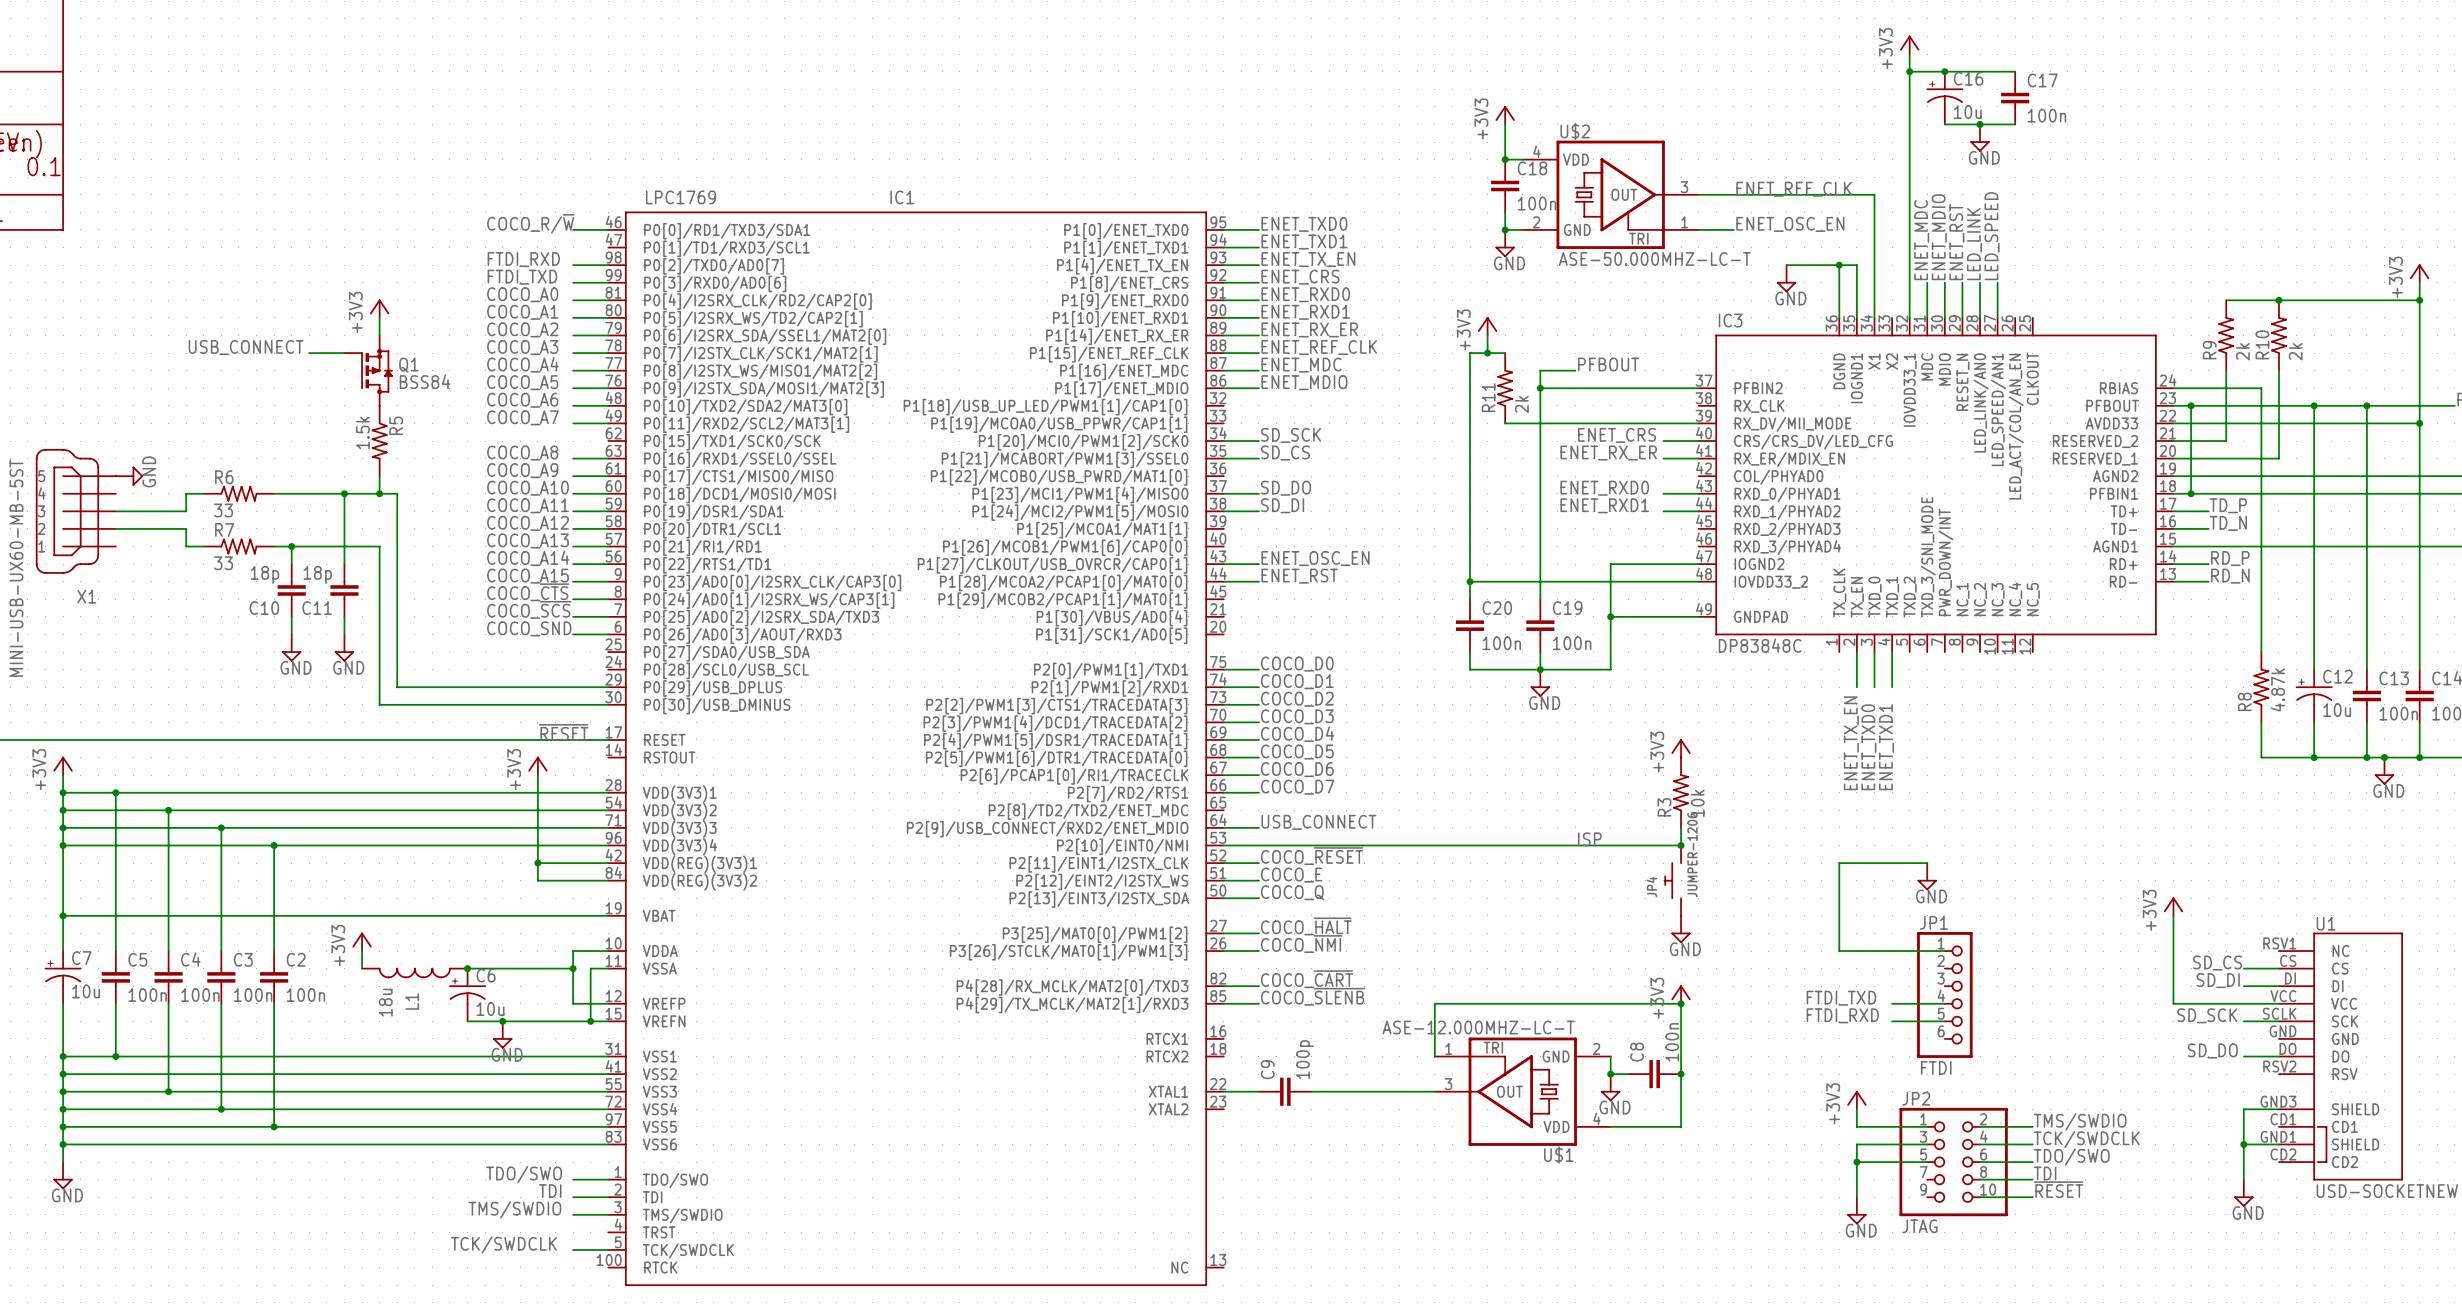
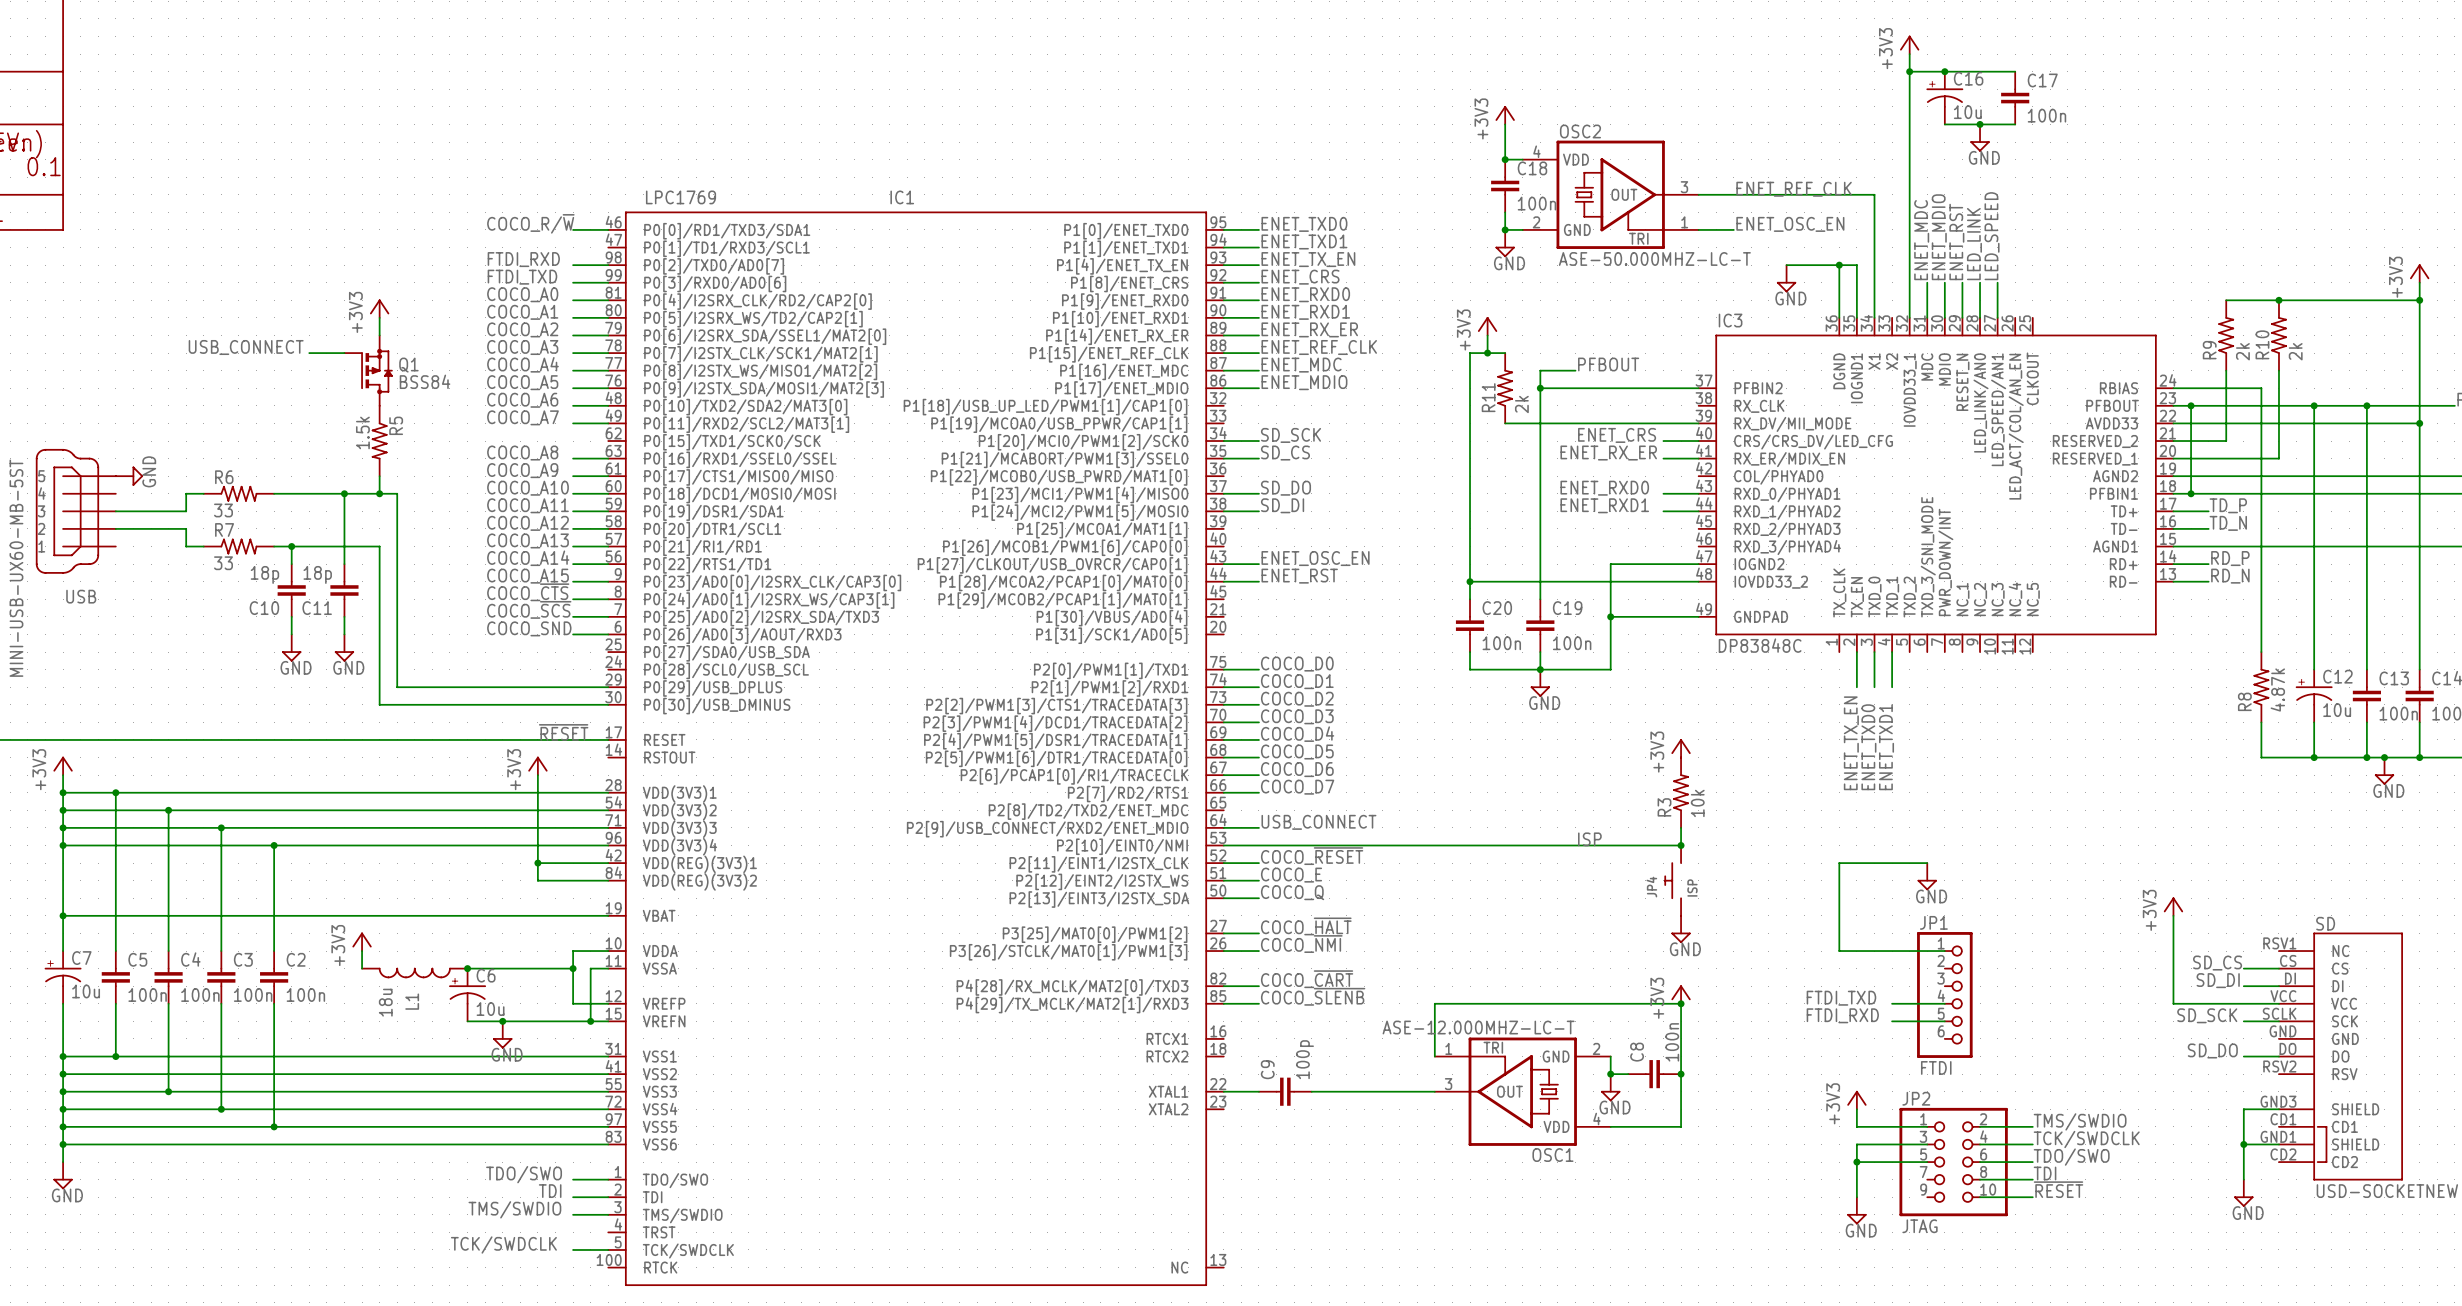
U$2 name: U$2 (1575, 131) -> OSC2 (1580, 131)
X1 name: X1 (86, 596) -> USB (81, 596)
JP4 value: JUMPER-1206 (1692, 854) -> ISP (1692, 888)
U1 name: U1 (2326, 923) -> SD (2325, 923)
U$1 name: U$1 (1558, 1155) -> OSC1 (1552, 1155)

